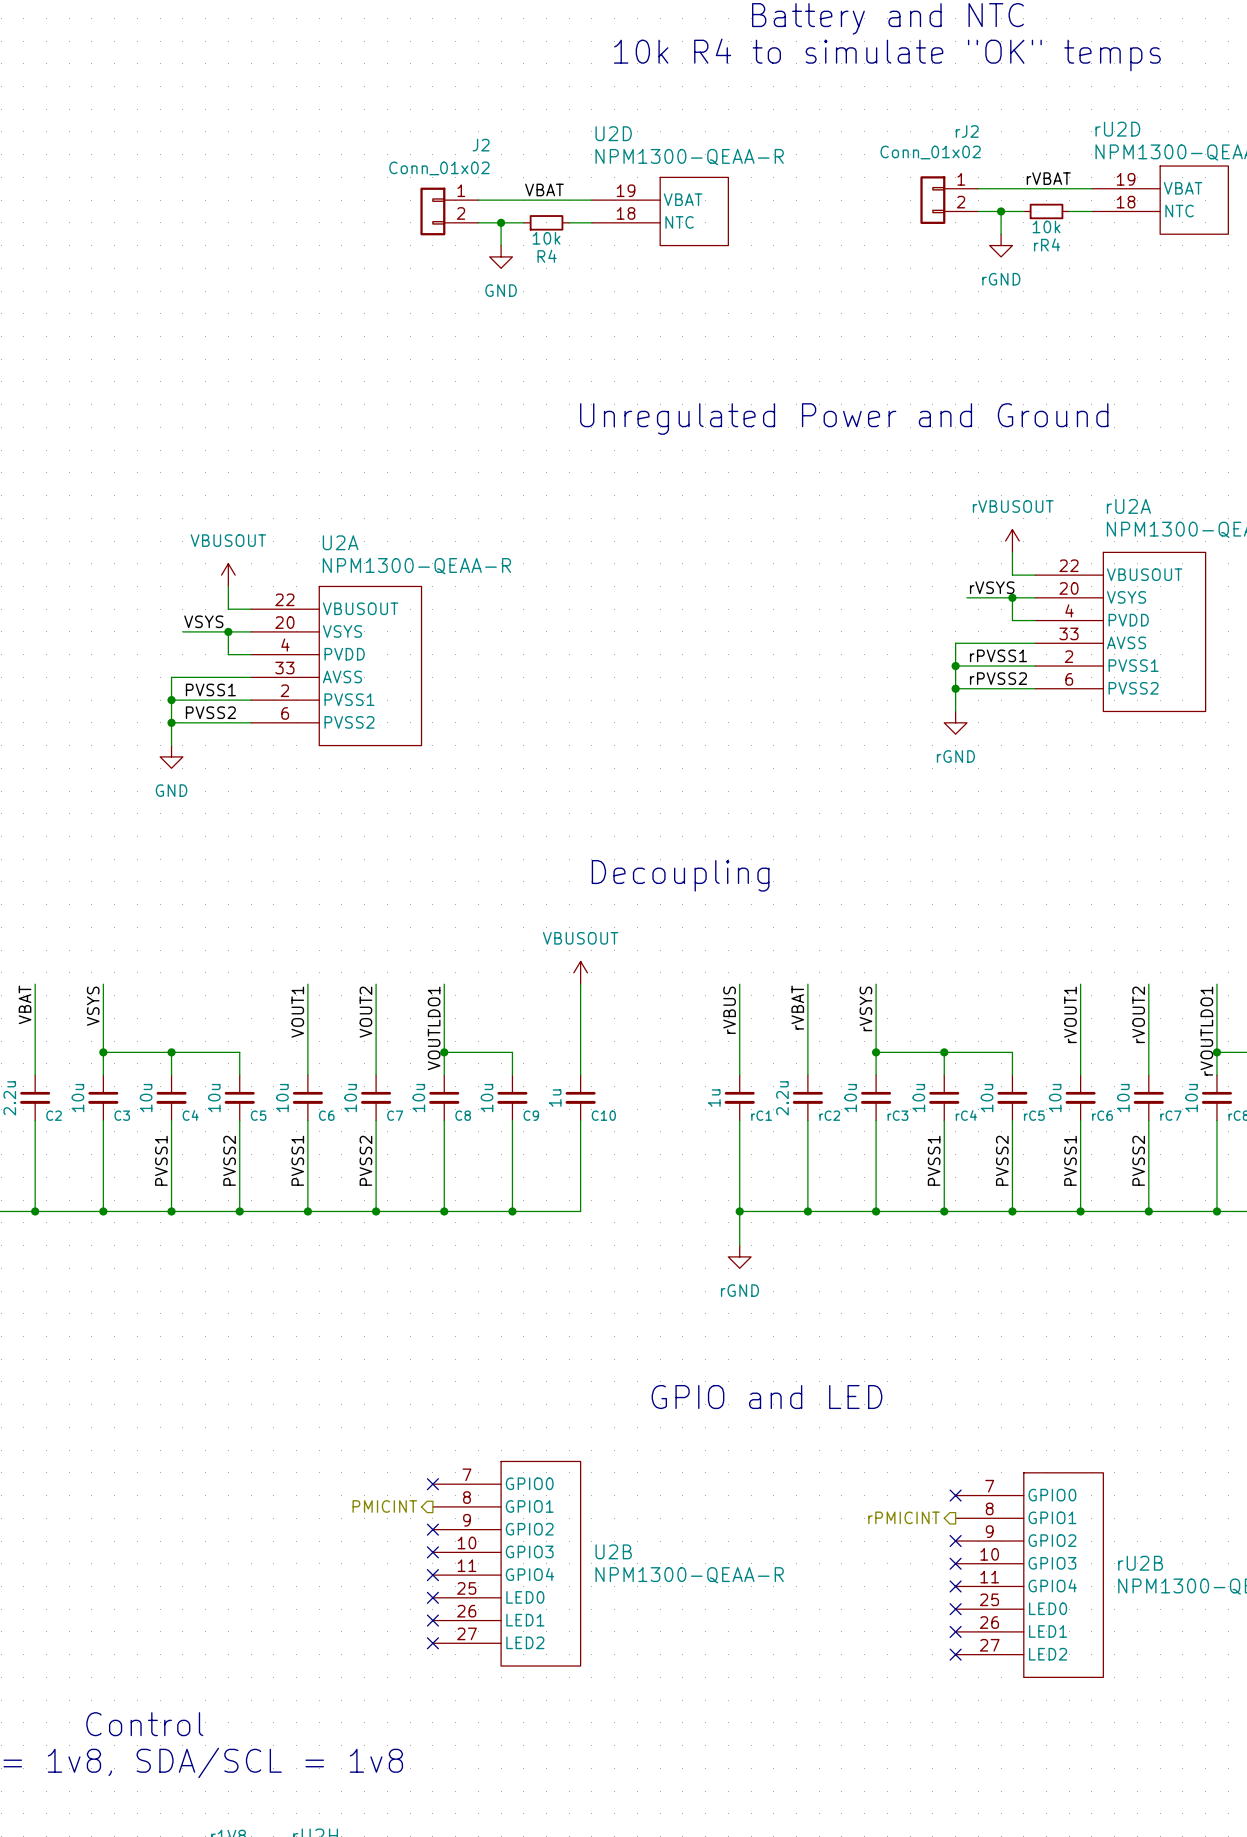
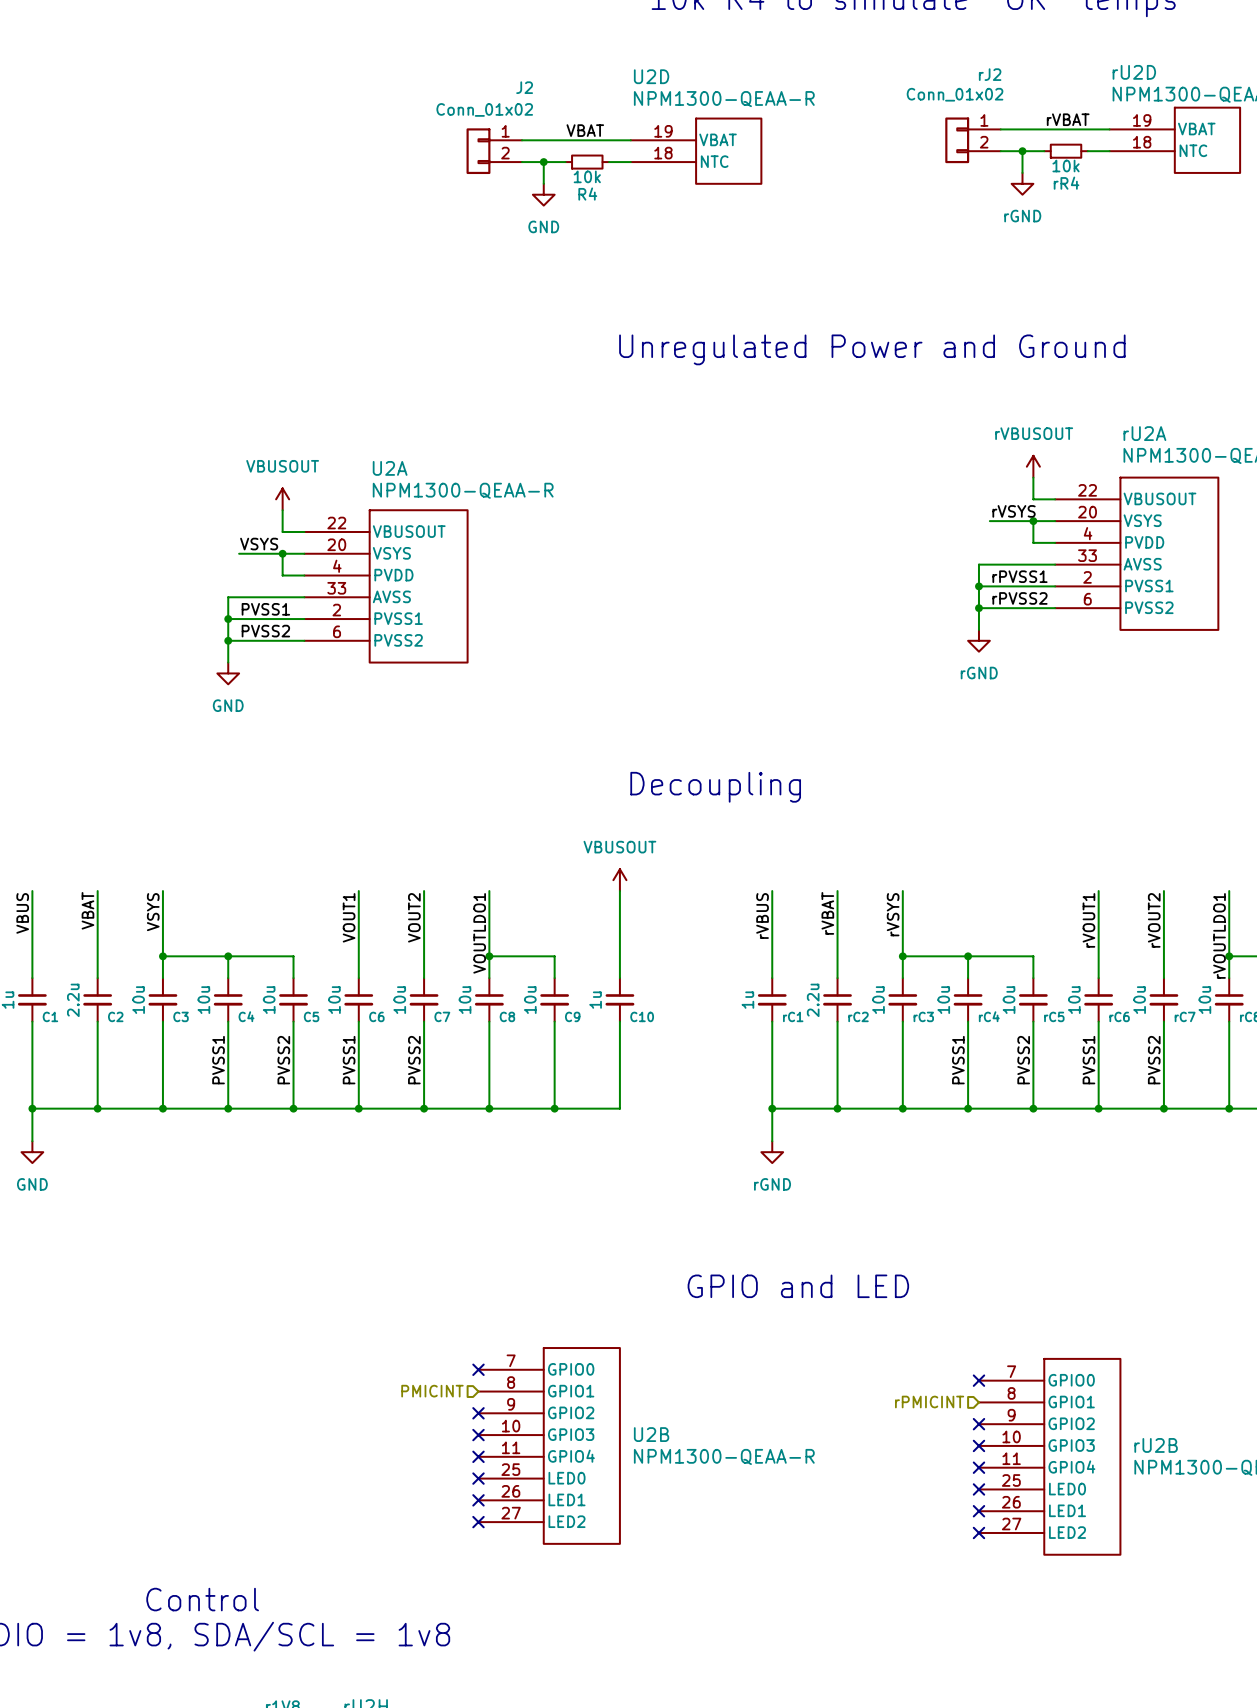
hierarchical label shape: output (384, 1506) -> input (432, 1391)
hierarchical label shape: output (904, 1517) -> input (929, 1402)

